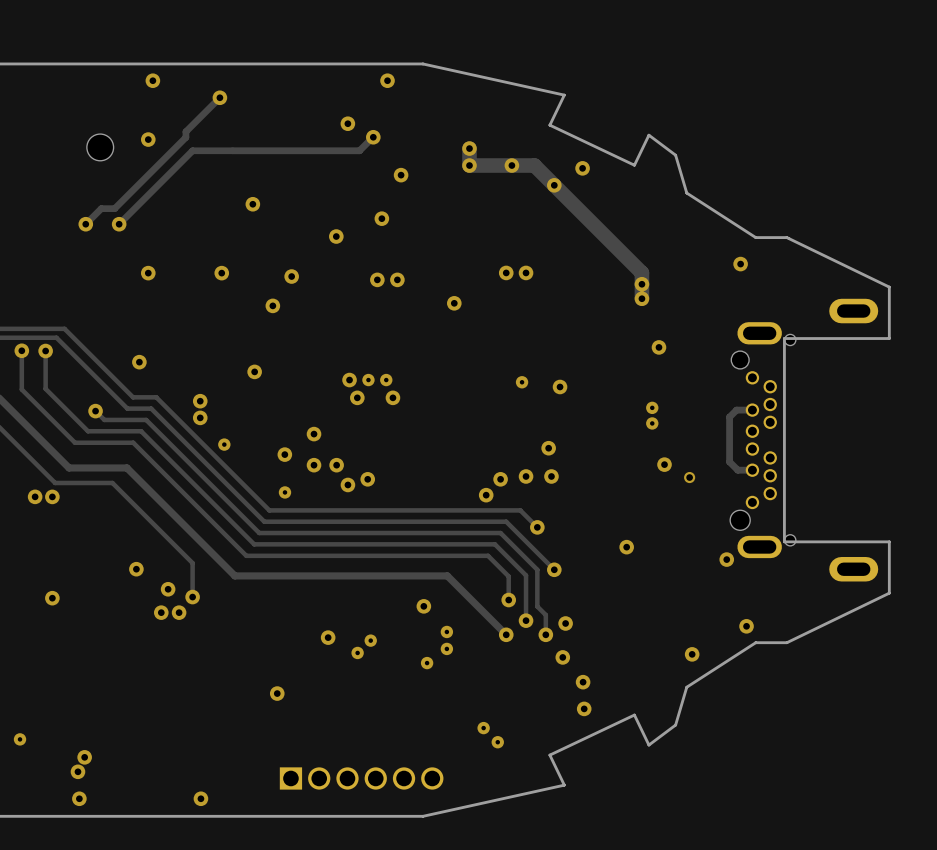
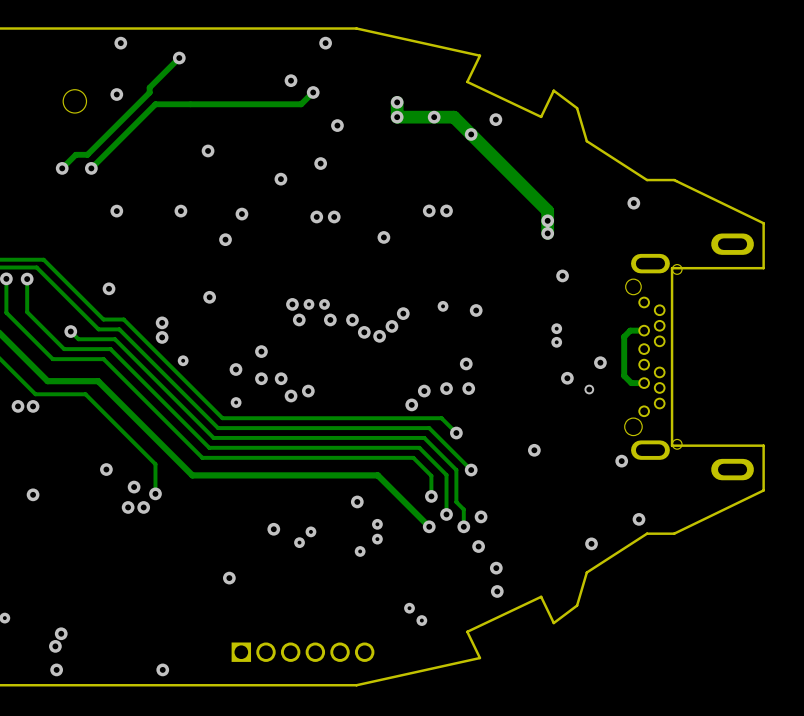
via: none -> (403, 313)
via: none -> (352, 320)
via: none -> (391, 326)
via: none -> (364, 332)
via: none -> (379, 336)
via: none -> (600, 362)

